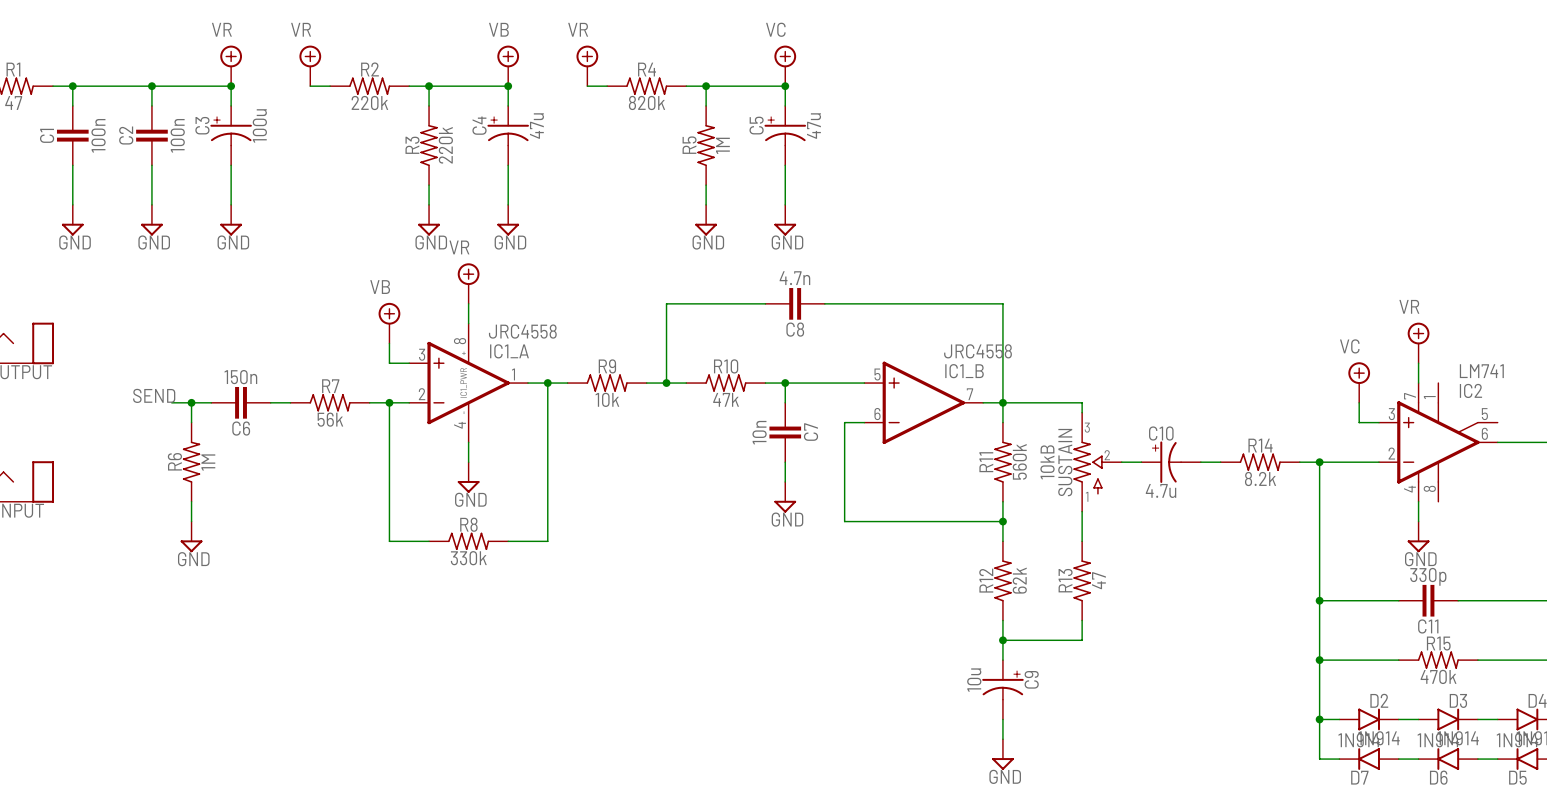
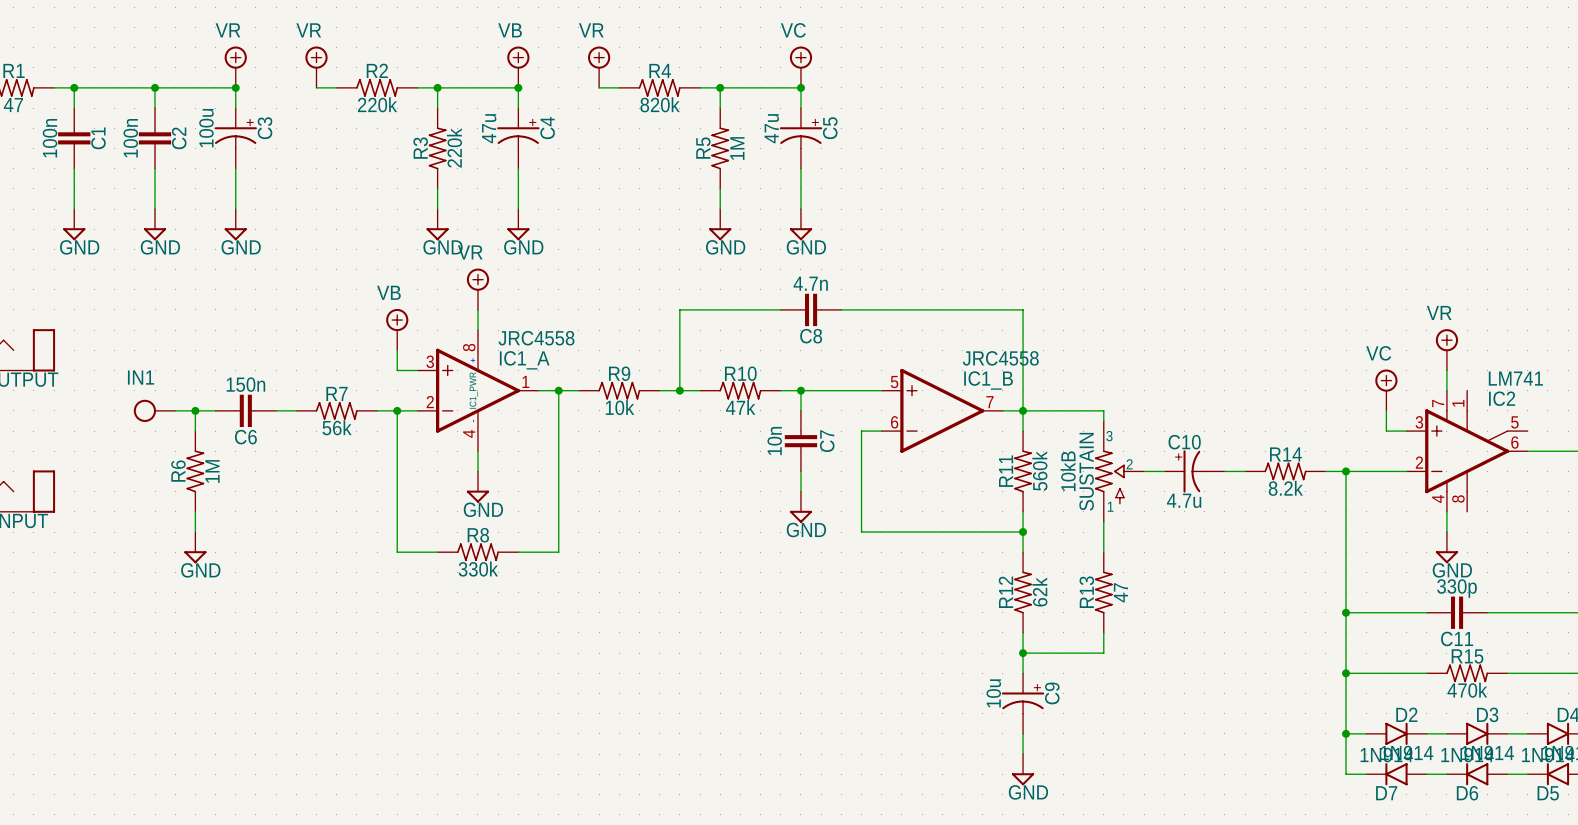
C3 flip: as is (231, 131) -> left-right (235, 133)
C4 flip: as is (508, 131) -> left-right (518, 133)
C5 flip: as is (785, 131) -> left-right (800, 133)
C1 name position: C1 (47, 135) -> C1 (98, 138)
C1 value position: 100n (98, 135) -> 100n (50, 138)
C2 name position: C2 (126, 135) -> C2 (179, 138)
C2 value position: 100n (177, 135) -> 100n (130, 138)
label: SEND (154, 395) -> none
IN1: none -> (154, 410)

